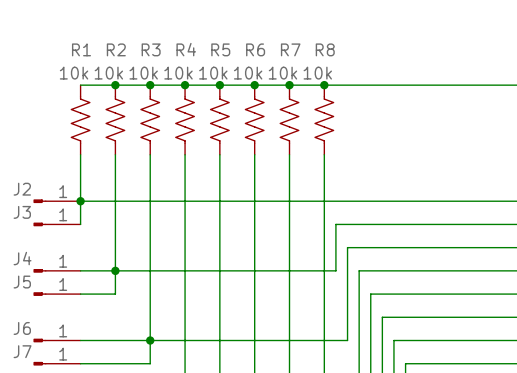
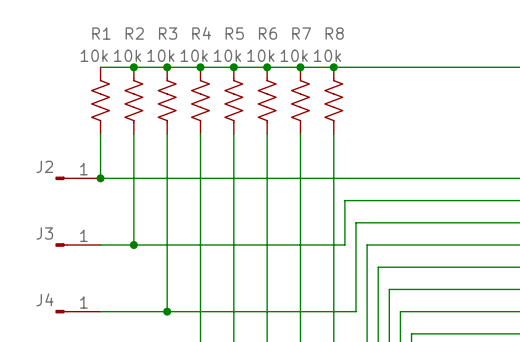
wire: (80, 201) (80, 224) -> none
J3: (57, 224) -> none
J4 name: J4 (22, 258) -> J3 (44, 233)
wire: (115, 270) (115, 294) (80, 294) -> none
J5: (57, 294) -> none
J6 name: J6 (22, 328) -> J4 (45, 299)
wire: (150, 340) (150, 363) (80, 363) -> none
J7: (57, 363) -> none

